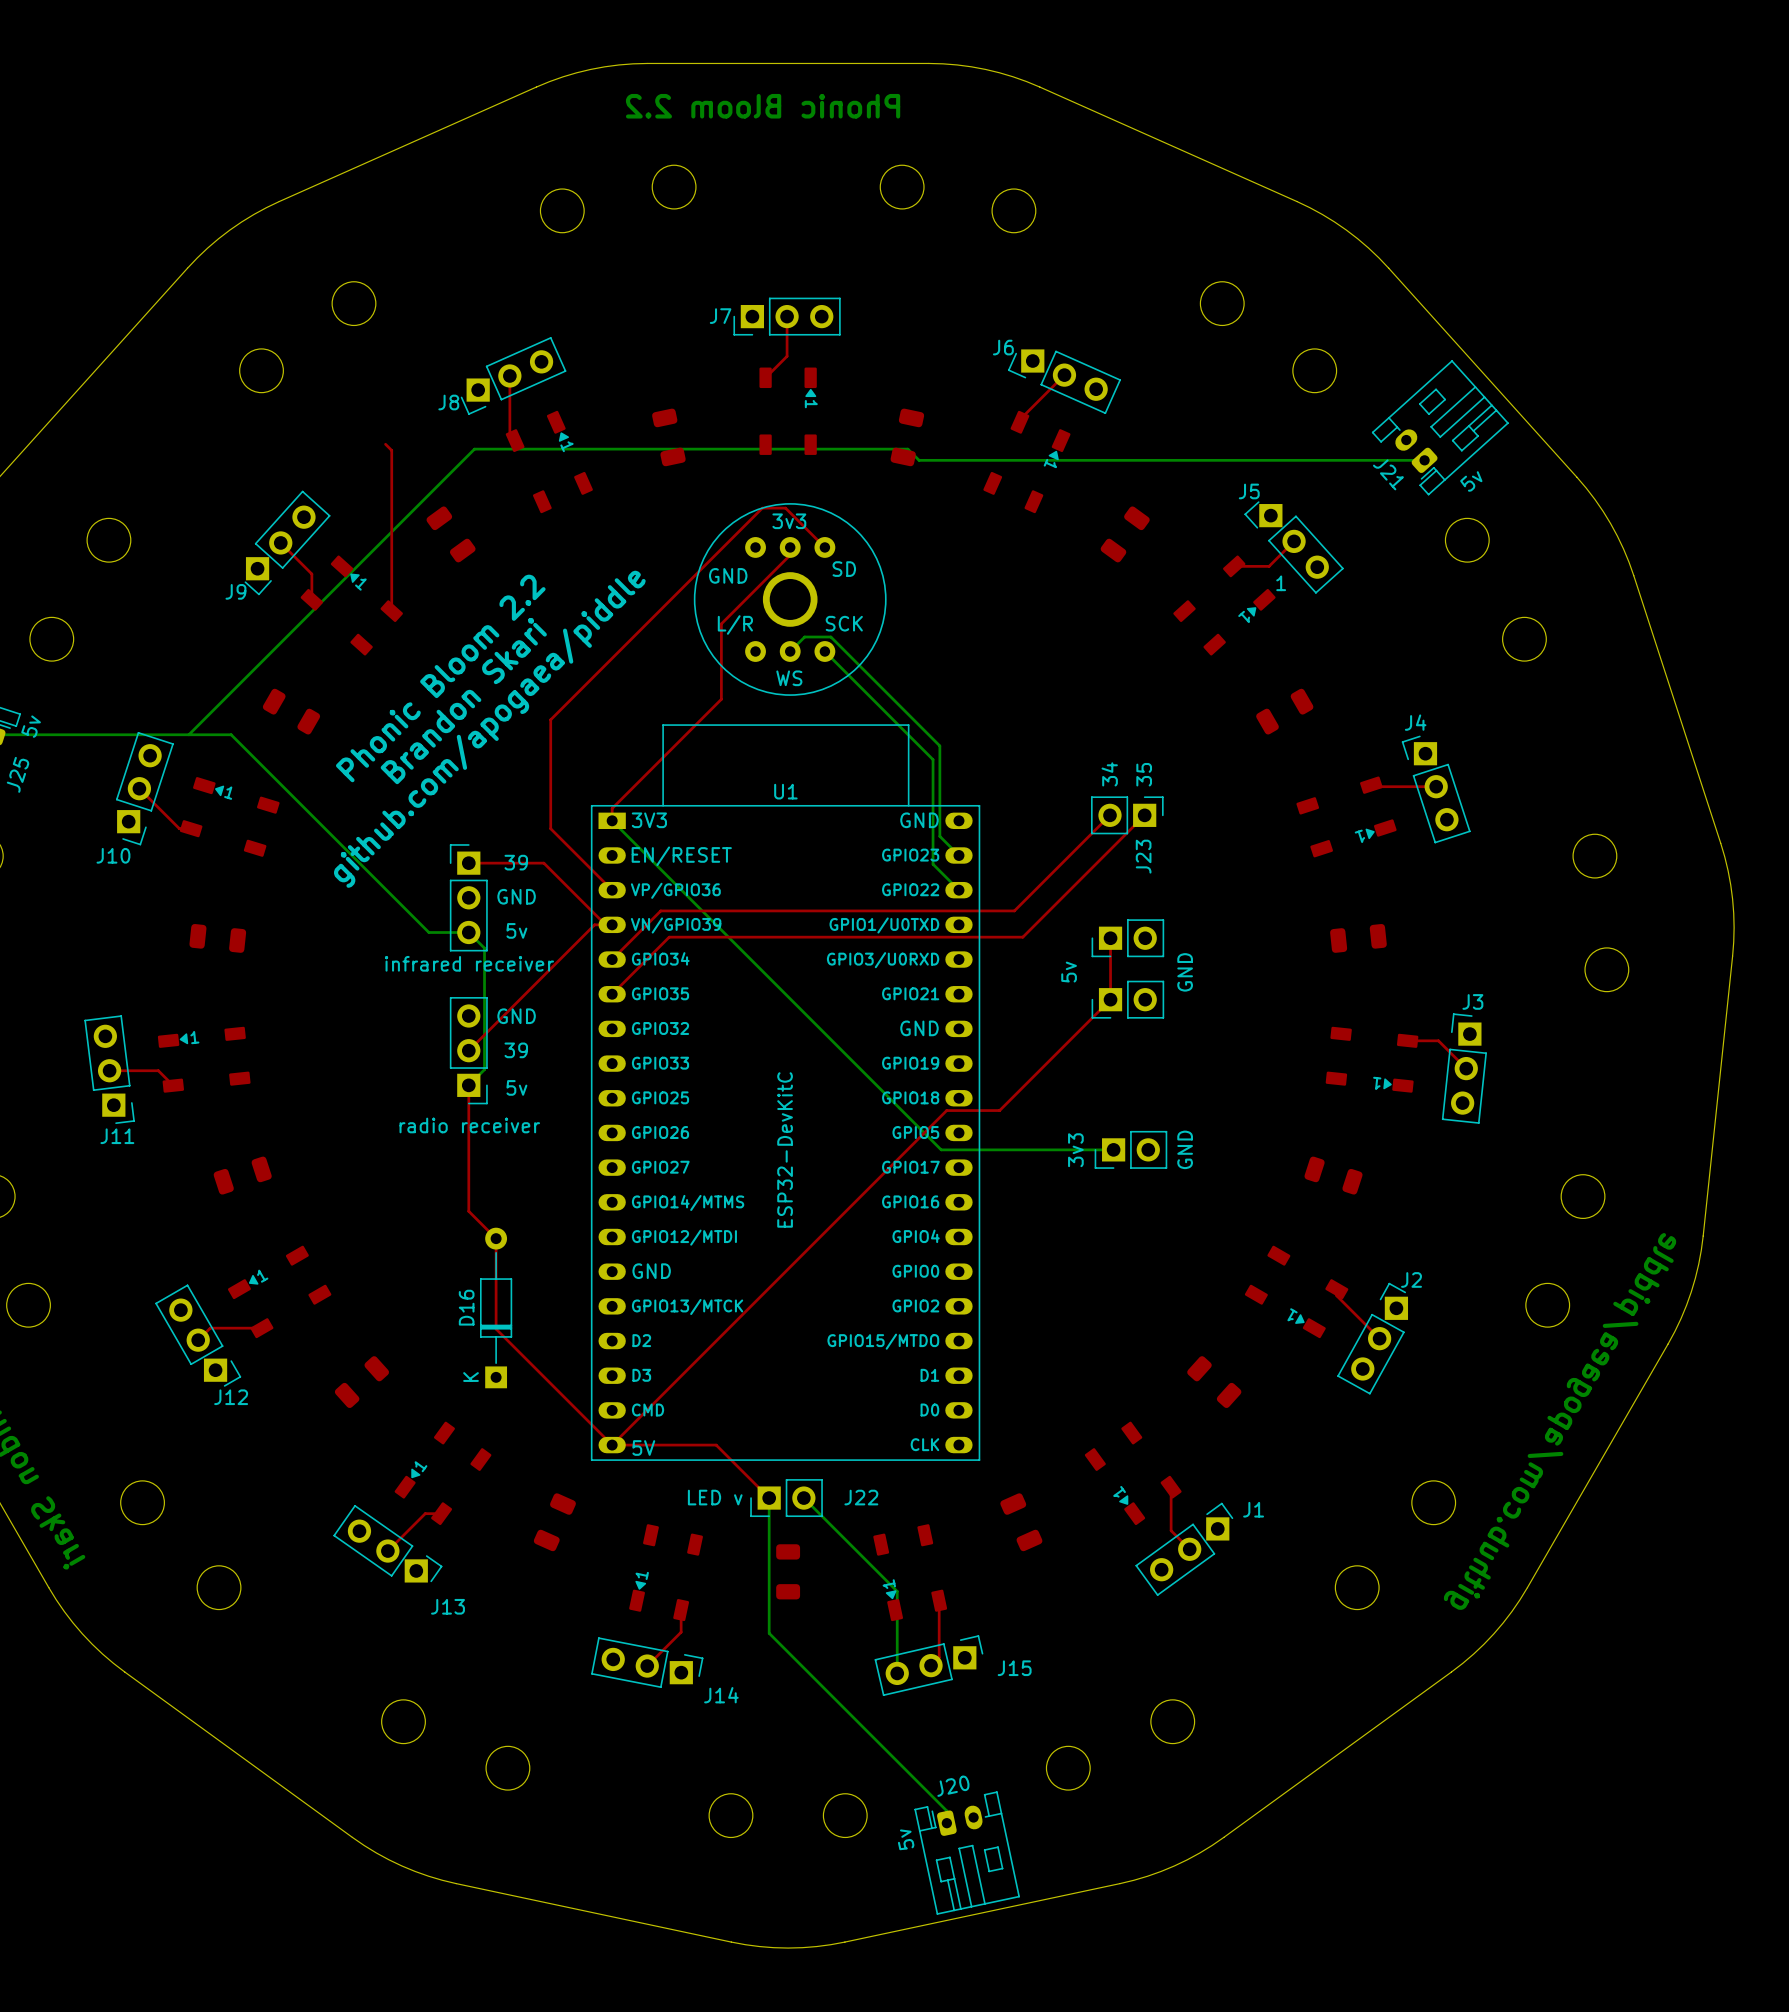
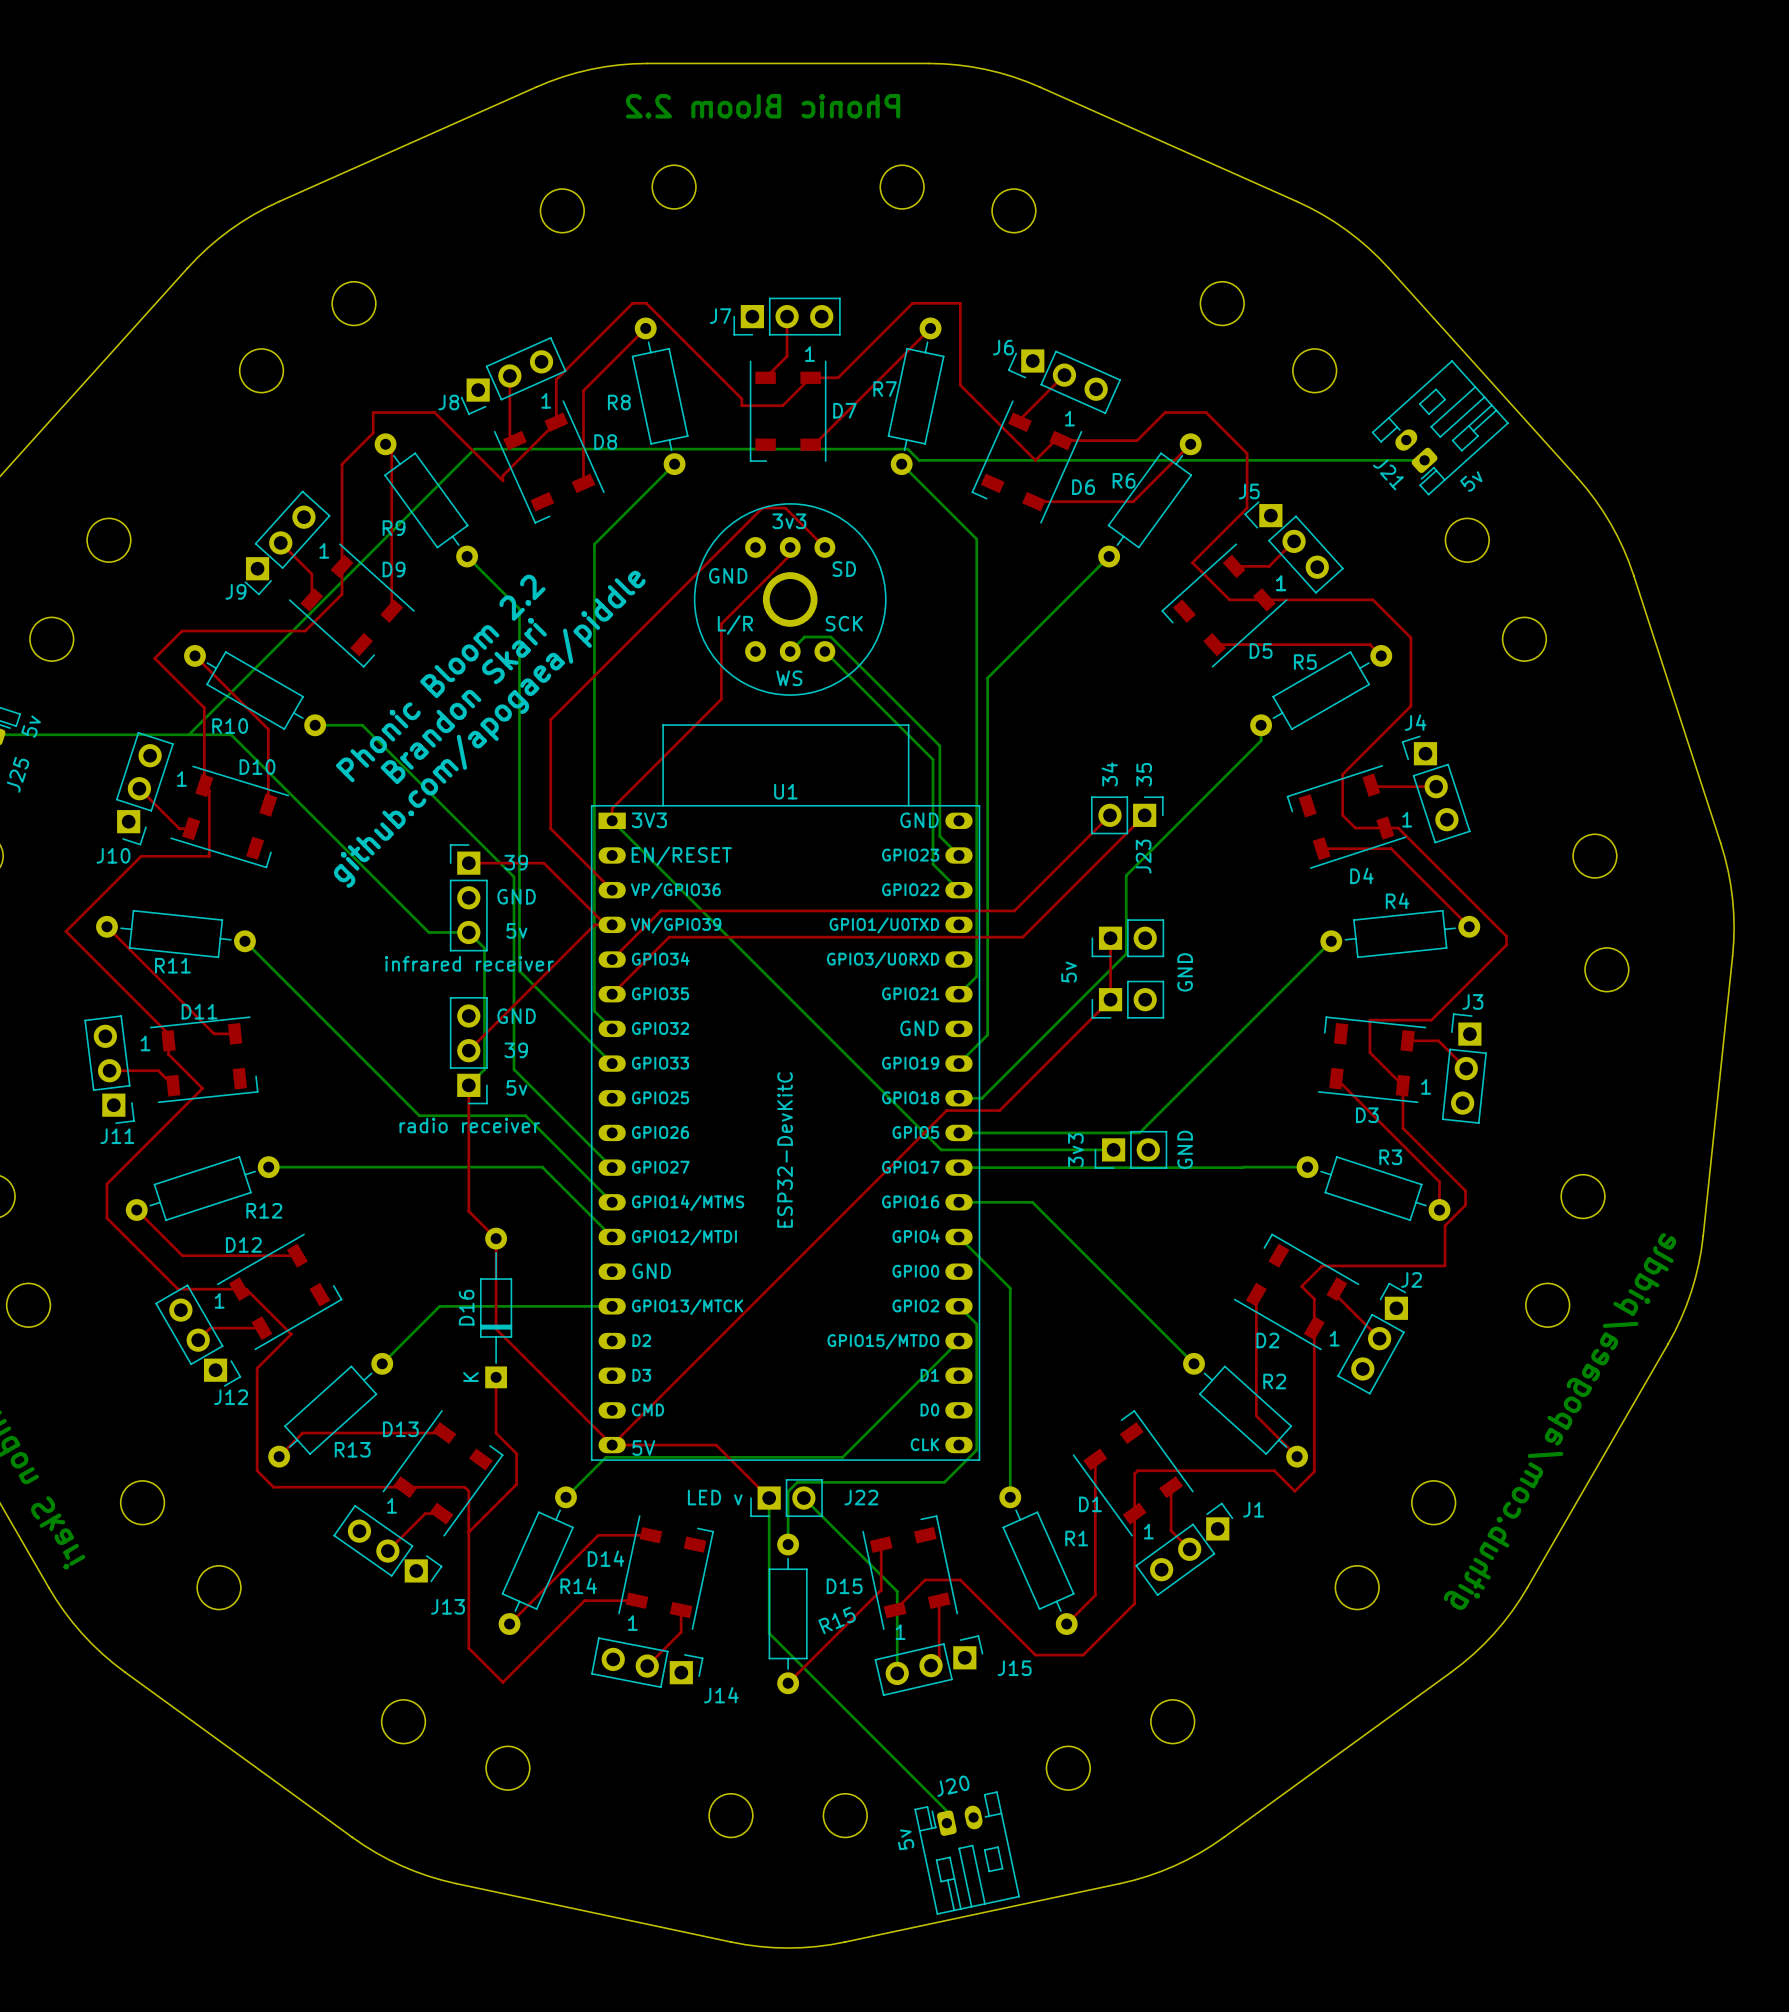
top track: none -> (645, 328) (583, 390) (583, 483)
top track: none -> (930, 328) (814, 444) (810, 444)
R8: none -> (660, 396)
R7: none -> (916, 396)
part: (788, 411) -> none
D7: none -> (788, 411)
part: (668, 437) -> none
part: (907, 437) -> none
top track: none -> (1190, 444) (1133, 501) (1033, 501)
part: (549, 462) -> none
D8: none -> (549, 462)
part: (1026, 462) -> none
D6: none -> (1026, 462)
bottom track: none -> (674, 464) (594, 544) (594, 1011) (612, 1028)
bottom track: none -> (901, 464) (976, 539) (976, 976) (958, 994)
R9: none -> (426, 500)
R6: none -> (1149, 500)
part: (451, 534) -> none
part: (1125, 534) -> none
bottom track: none -> (467, 556) (519, 608) (519, 970) (612, 1063)
bottom track: none -> (1109, 556) (987, 678) (987, 1034) (958, 1063)
part: (351, 605) -> none
D9: none -> (351, 605)
part: (1224, 605) -> none
D5: none -> (1224, 605)
top track: none -> (1214, 644) (1369, 644) (1381, 655)
top track: none -> (194, 655) (268, 729) (268, 805)
R10: none -> (255, 690)
R5: none -> (1321, 690)
part: (291, 711) -> none
part: (1284, 711) -> none
bottom track: none -> (315, 725) (362, 725) (514, 876) (514, 1069) (612, 1167)
bottom track: none -> (1261, 725) (1261, 740) (1126, 875) (1126, 953) (981, 1098) (958, 1098)
part: (229, 816) -> none
D10: none -> (229, 816)
part: (1346, 816) -> none
D4: none -> (1346, 816)
top track: none -> (1321, 848) (1391, 848) (1469, 926)
top track: none -> (106, 926) (214, 1033) (235, 1033)
R11: none -> (175, 934)
R4: none -> (1400, 934)
part: (217, 938) -> none
part: (1358, 938) -> none
bottom track: none -> (244, 941) (419, 1115) (525, 1115) (612, 1202)
bottom track: none -> (1331, 941) (1139, 1132) (958, 1132)
part: (204, 1059) -> none
D11: none -> (204, 1059)
part: (1372, 1059) -> none
D3: none -> (1372, 1059)
top track: none -> (1336, 1078) (1439, 1181) (1439, 1210)
bottom track: none -> (268, 1167) (542, 1167) (612, 1236)
bottom track: none -> (1307, 1167) (958, 1167)
part: (242, 1175) -> none
part: (1333, 1175) -> none
R12: none -> (202, 1188)
R3: none -> (1373, 1188)
bottom track: none -> (958, 1202) (1032, 1202) (1194, 1363)
top track: none -> (136, 1210) (182, 1255) (297, 1255)
bottom track: none -> (958, 1236) (1010, 1288) (1010, 1497)
part: (279, 1291) -> none
D12: none -> (279, 1291)
part: (1296, 1291) -> none
D2: none -> (1296, 1291)
top track: none -> (1256, 1294) (1256, 1415) (1297, 1456)
bottom track: none -> (612, 1306) (439, 1306) (382, 1363)
bottom track: none -> (958, 1306) (976, 1324) (976, 1450) (944, 1482) (797, 1482) (788, 1491) (788, 1544)
bottom track: none -> (958, 1341) (842, 1457) (605, 1457) (565, 1497)
top track: none -> (496, 1377) (496, 1433) (516, 1453) (516, 1484) (468, 1532)
part: (361, 1382) -> none
part: (1214, 1382) -> none
R13: none -> (330, 1410)
R2: none -> (1245, 1410)
top track: none -> (444, 1433) (302, 1433) (279, 1456)
top track: none -> (1095, 1459) (1095, 1595) (1066, 1624)
part: (443, 1473) -> none
D13: none -> (443, 1473)
part: (1133, 1473) -> none
D1: none -> (1133, 1473)
part: (554, 1522) -> none
part: (1021, 1522) -> none
top track: none -> (650, 1535) (598, 1535) (509, 1624)
top track: none -> (881, 1544) (881, 1590) (788, 1683)
R14: none -> (537, 1560)
R1: none -> (1038, 1560)
part: (788, 1571) -> none
part: (666, 1572) -> none
D14: none -> (666, 1572)
part: (910, 1572) -> none
D15: none -> (910, 1572)
top track: none -> (637, 1600) (584, 1600) (502, 1682) (468, 1648) (468, 1491) (464, 1487) (273, 1487) (257, 1470) (257, 1368) (291, 1334) (246, 1289) (177, 1289) (106, 1218) (106, 1184) (202, 1088) (168, 1054) (168, 1034) (66, 931) (141, 856) (209, 856) (209, 790) (204, 785) (204, 707) (154, 658) (182, 631) (305, 631) (342, 594) (342, 464) (373, 433) (373, 412) (434, 412) (502, 480) (502, 475) (556, 422) (556, 379) (632, 303) (646, 303) (741, 398) (741, 405) (782, 405) (810, 377) (838, 377) (912, 303) (960, 303) (960, 385) (1035, 460) (1055, 440) (1137, 440) (1165, 412) (1206, 412) (1247, 453) (1247, 508) (1192, 562) (1229, 599) (1372, 599) (1410, 637) (1410, 706) (1342, 774) (1342, 815) (1355, 828) (1398, 828) (1506, 936) (1506, 945) (1431, 1020) (1369, 1020) (1369, 1052) (1402, 1085) (1402, 1128) (1465, 1190) (1465, 1205) (1445, 1225) (1445, 1265) (1322, 1265) (1301, 1286) (1314, 1299) (1314, 1471) (1294, 1491) (1274, 1470) (1137, 1470) (1134, 1473) (1134, 1603) (1083, 1655) (1035, 1655) (960, 1579) (925, 1579) (895, 1610)
R15: none -> (788, 1613)

